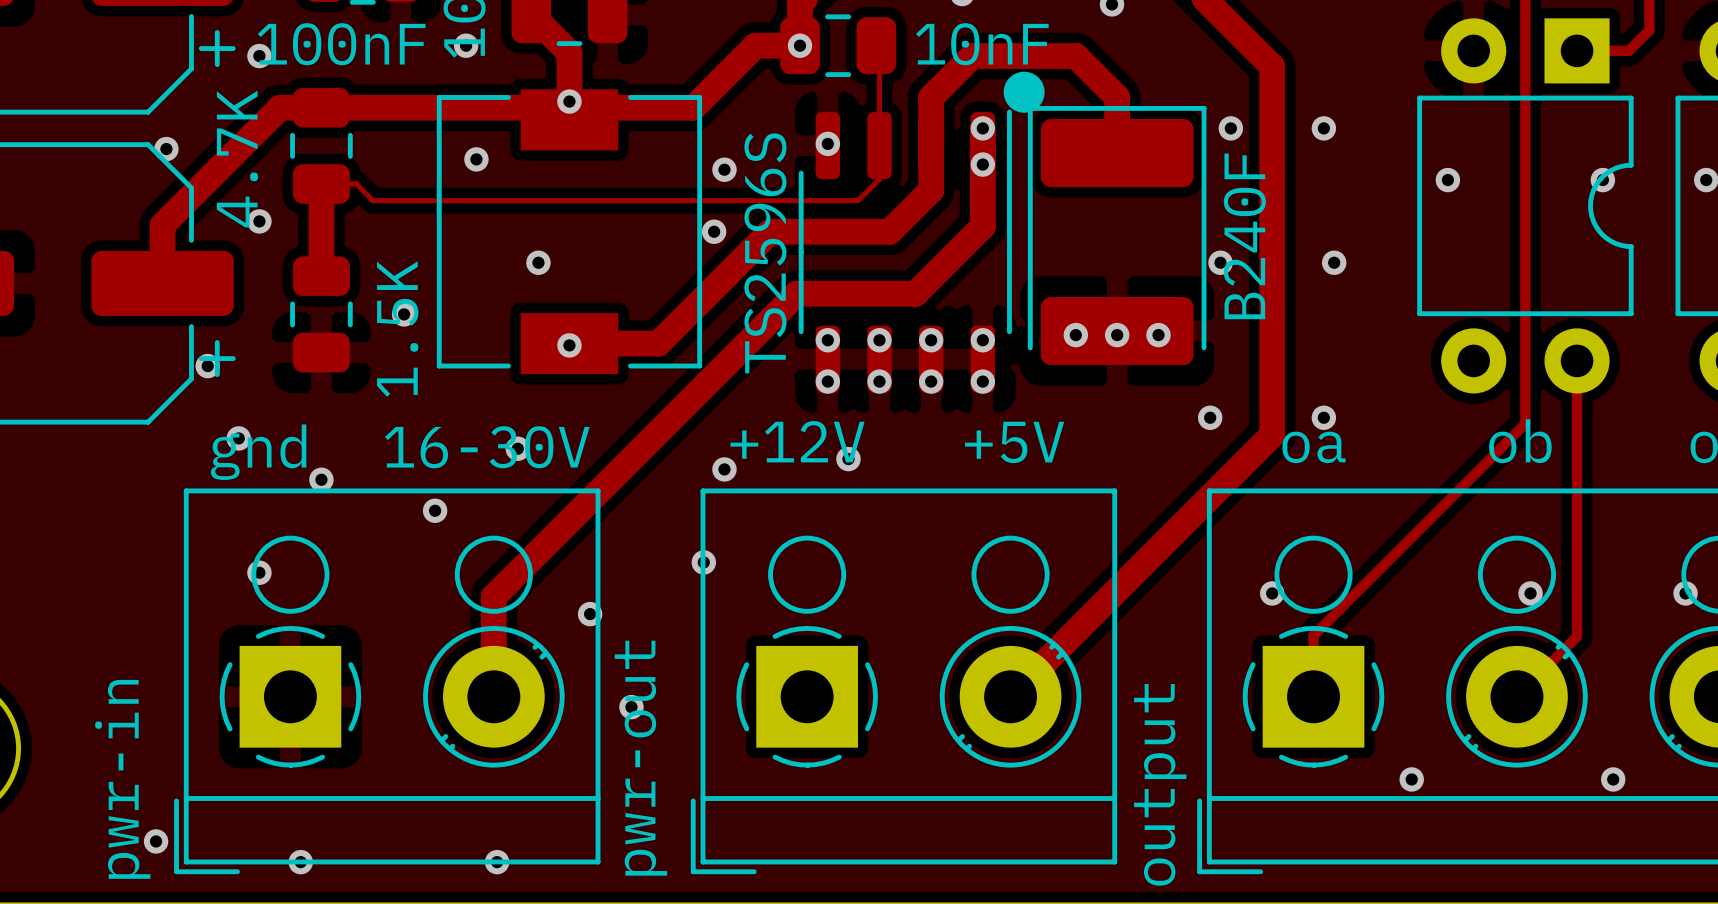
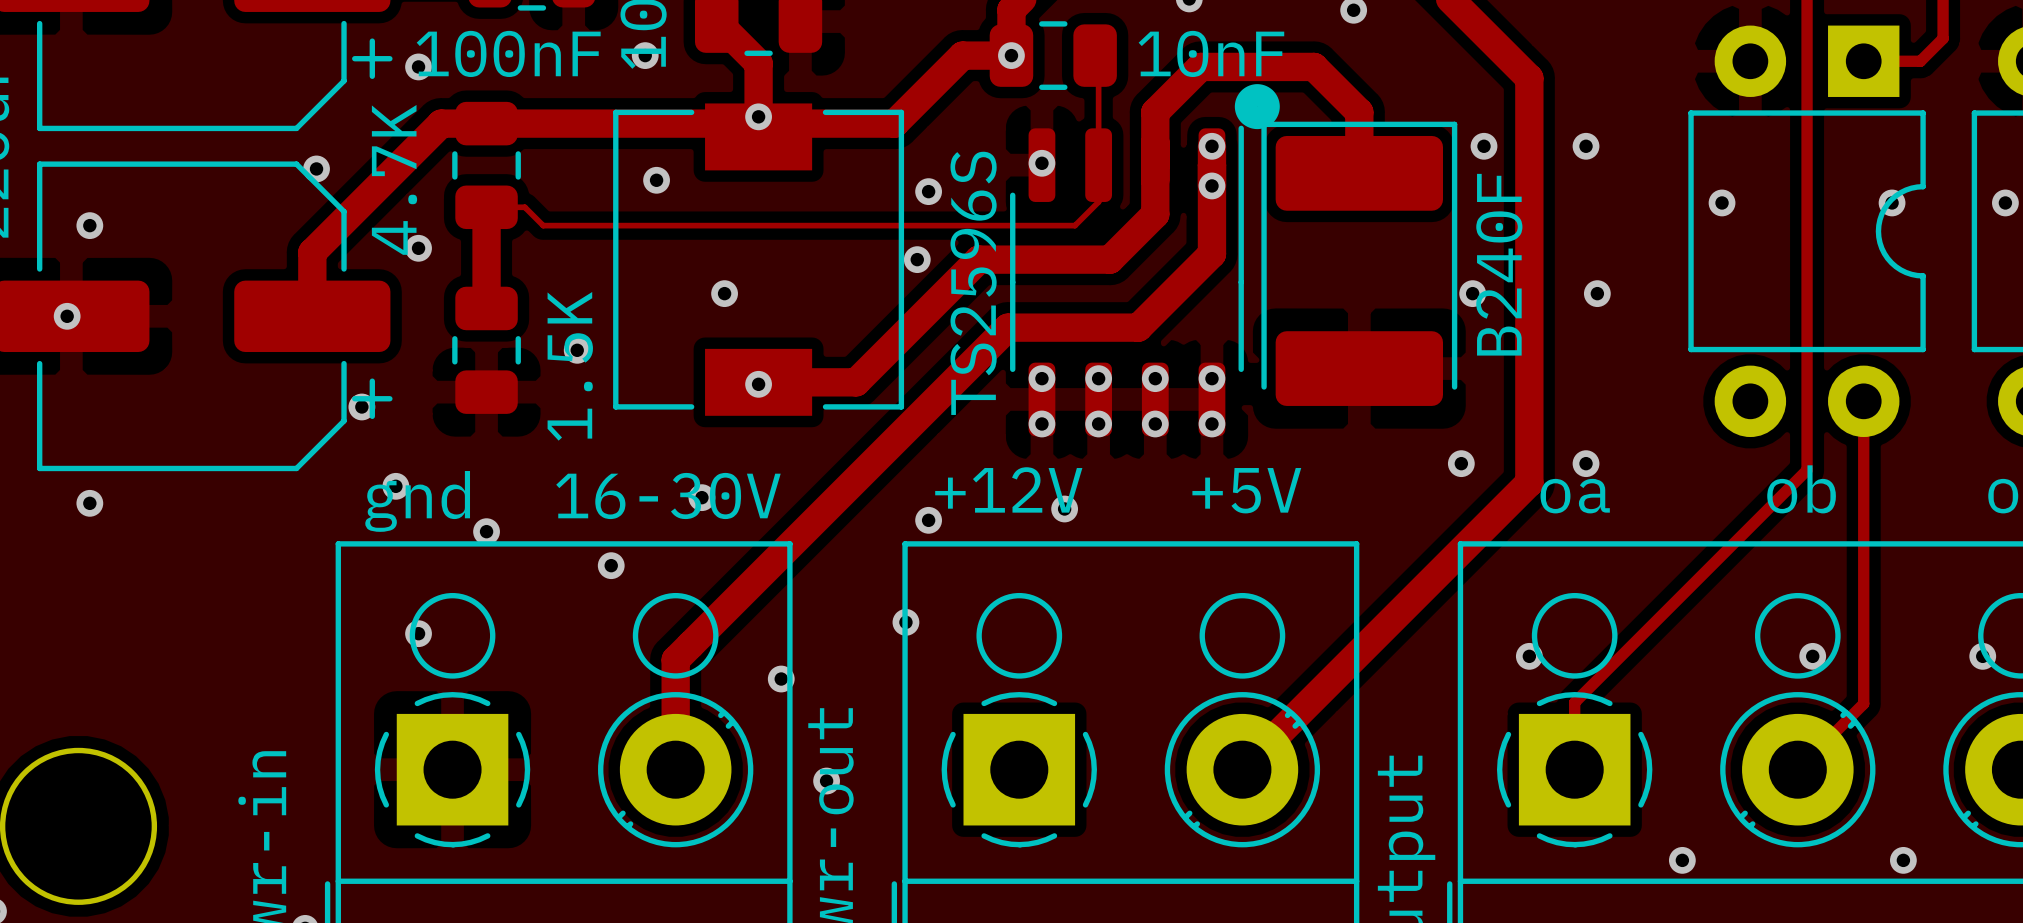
via: (1075, 335) -> none
via: (1117, 335) -> none
via: (1158, 335) -> none

